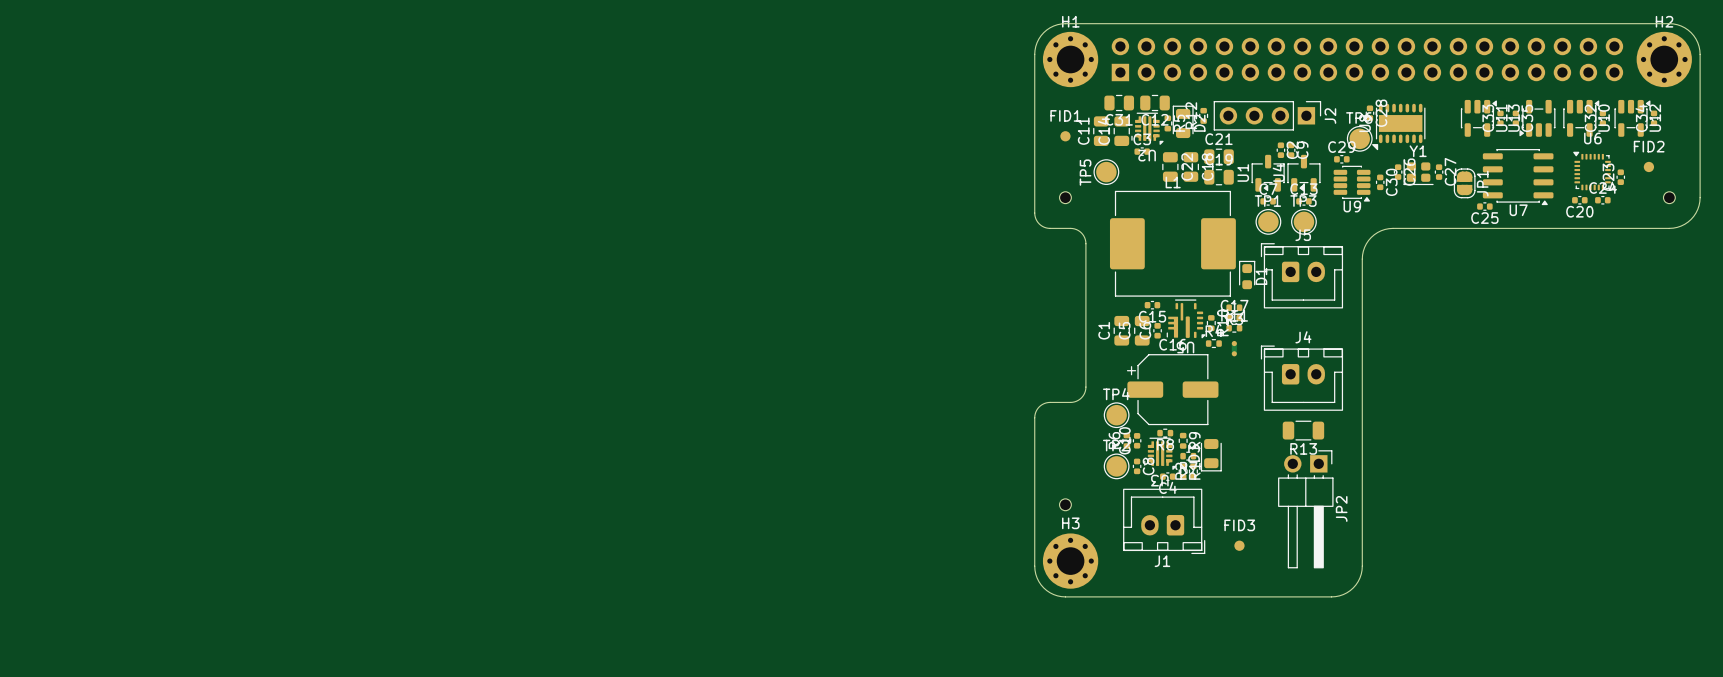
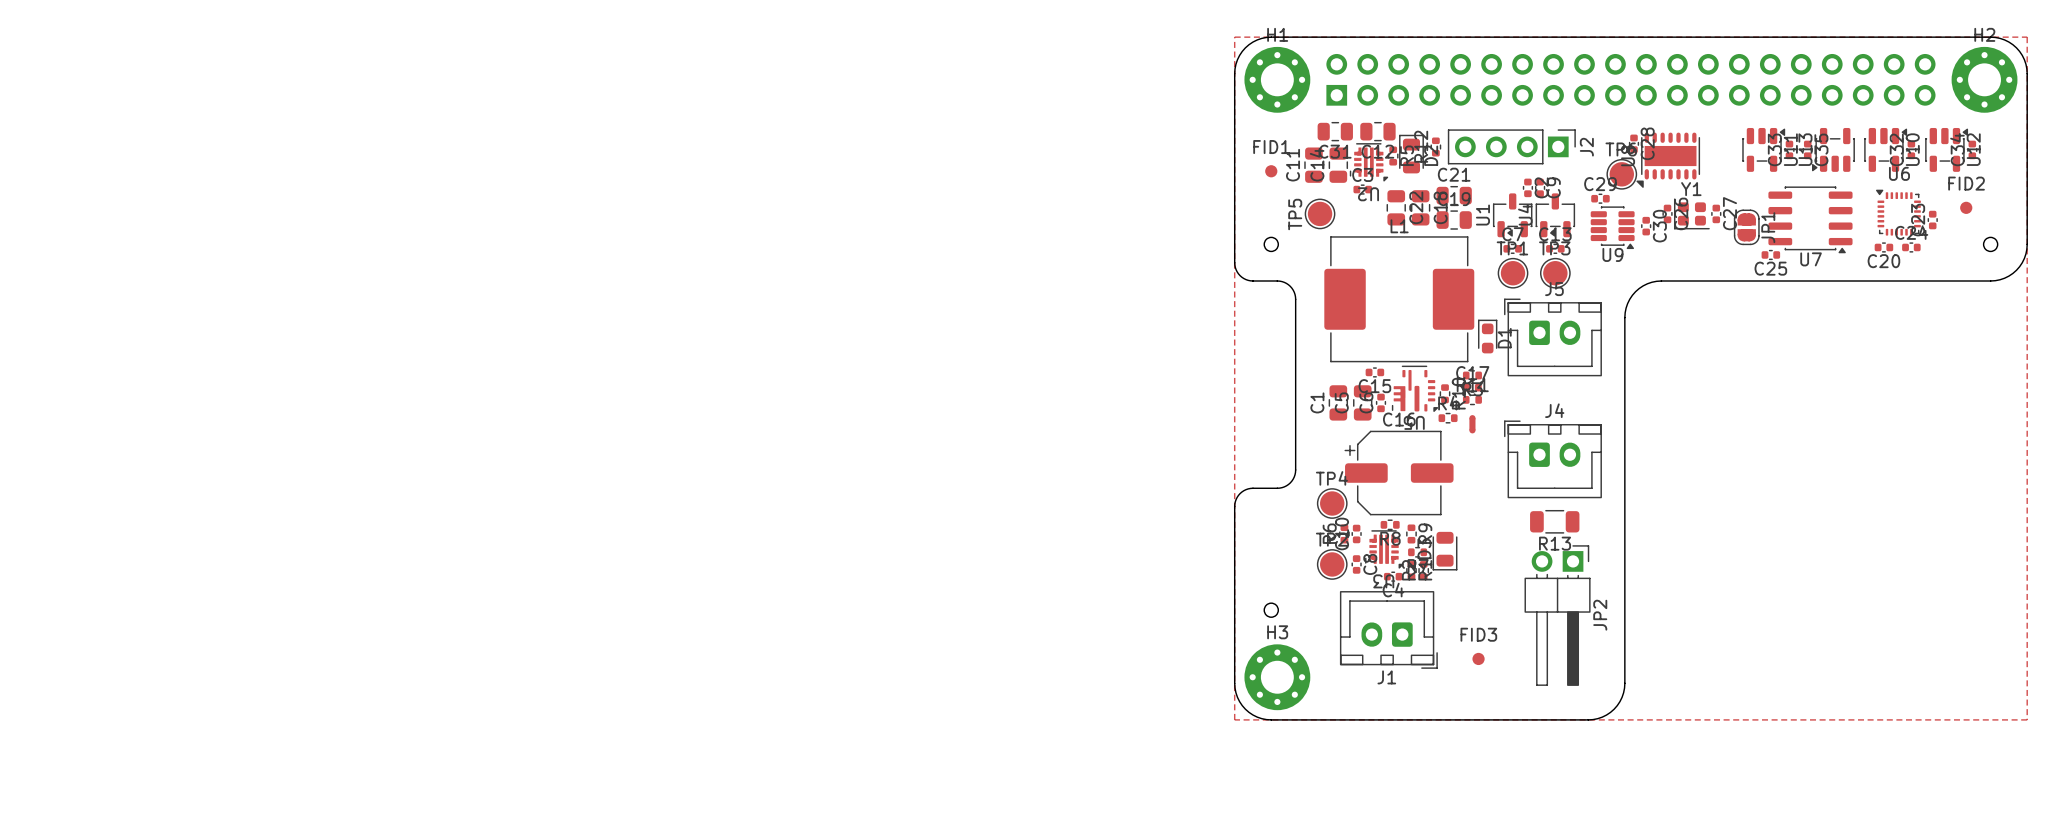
zone outline: none -> (1234, 37) (2027, 37) (2027, 719) (1234, 719) (1234, 37)

